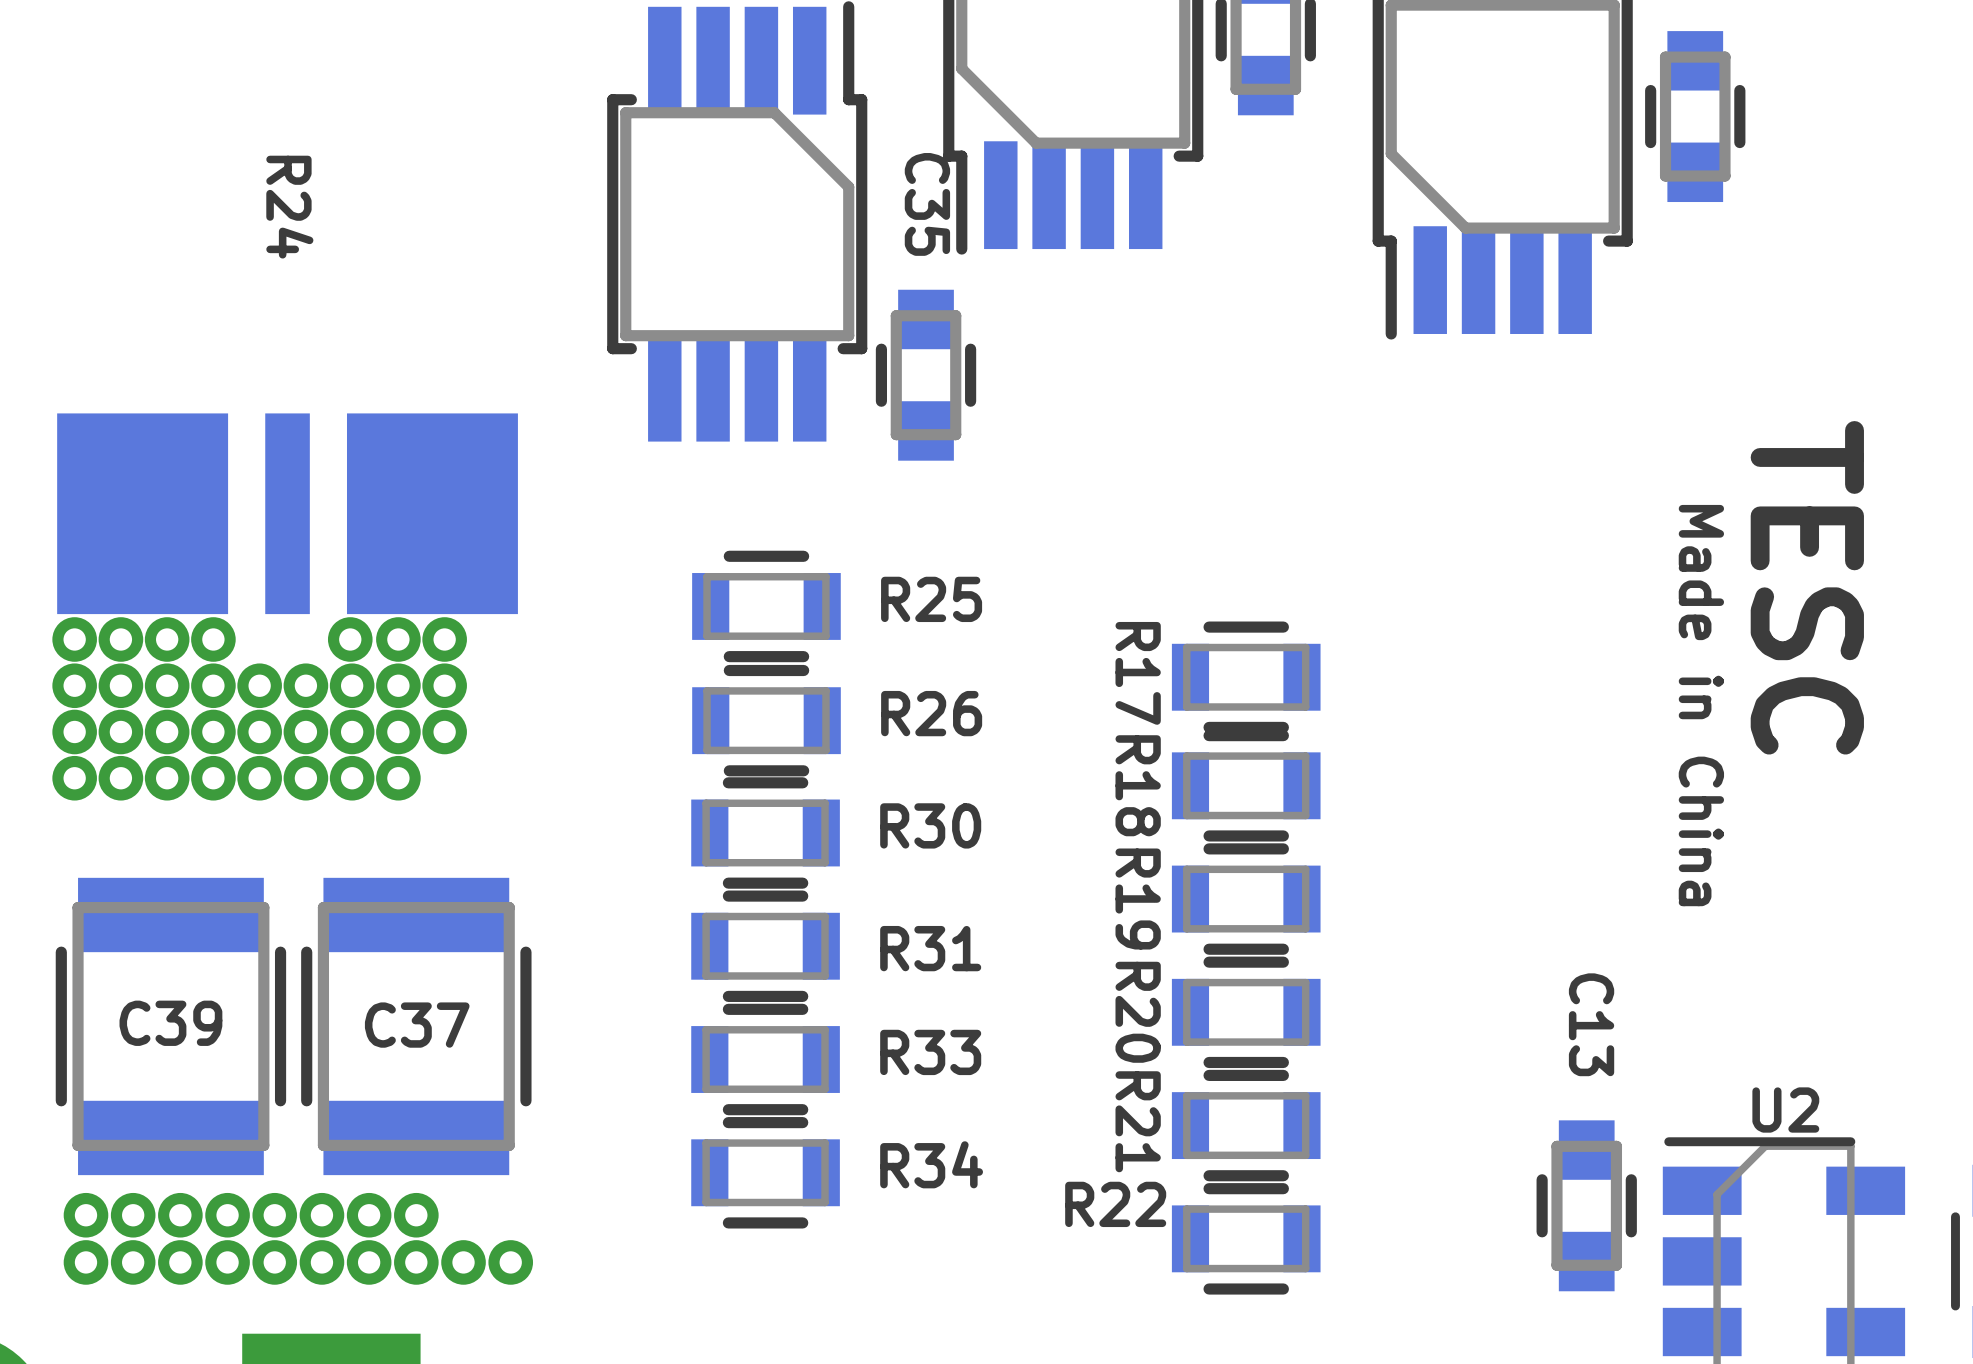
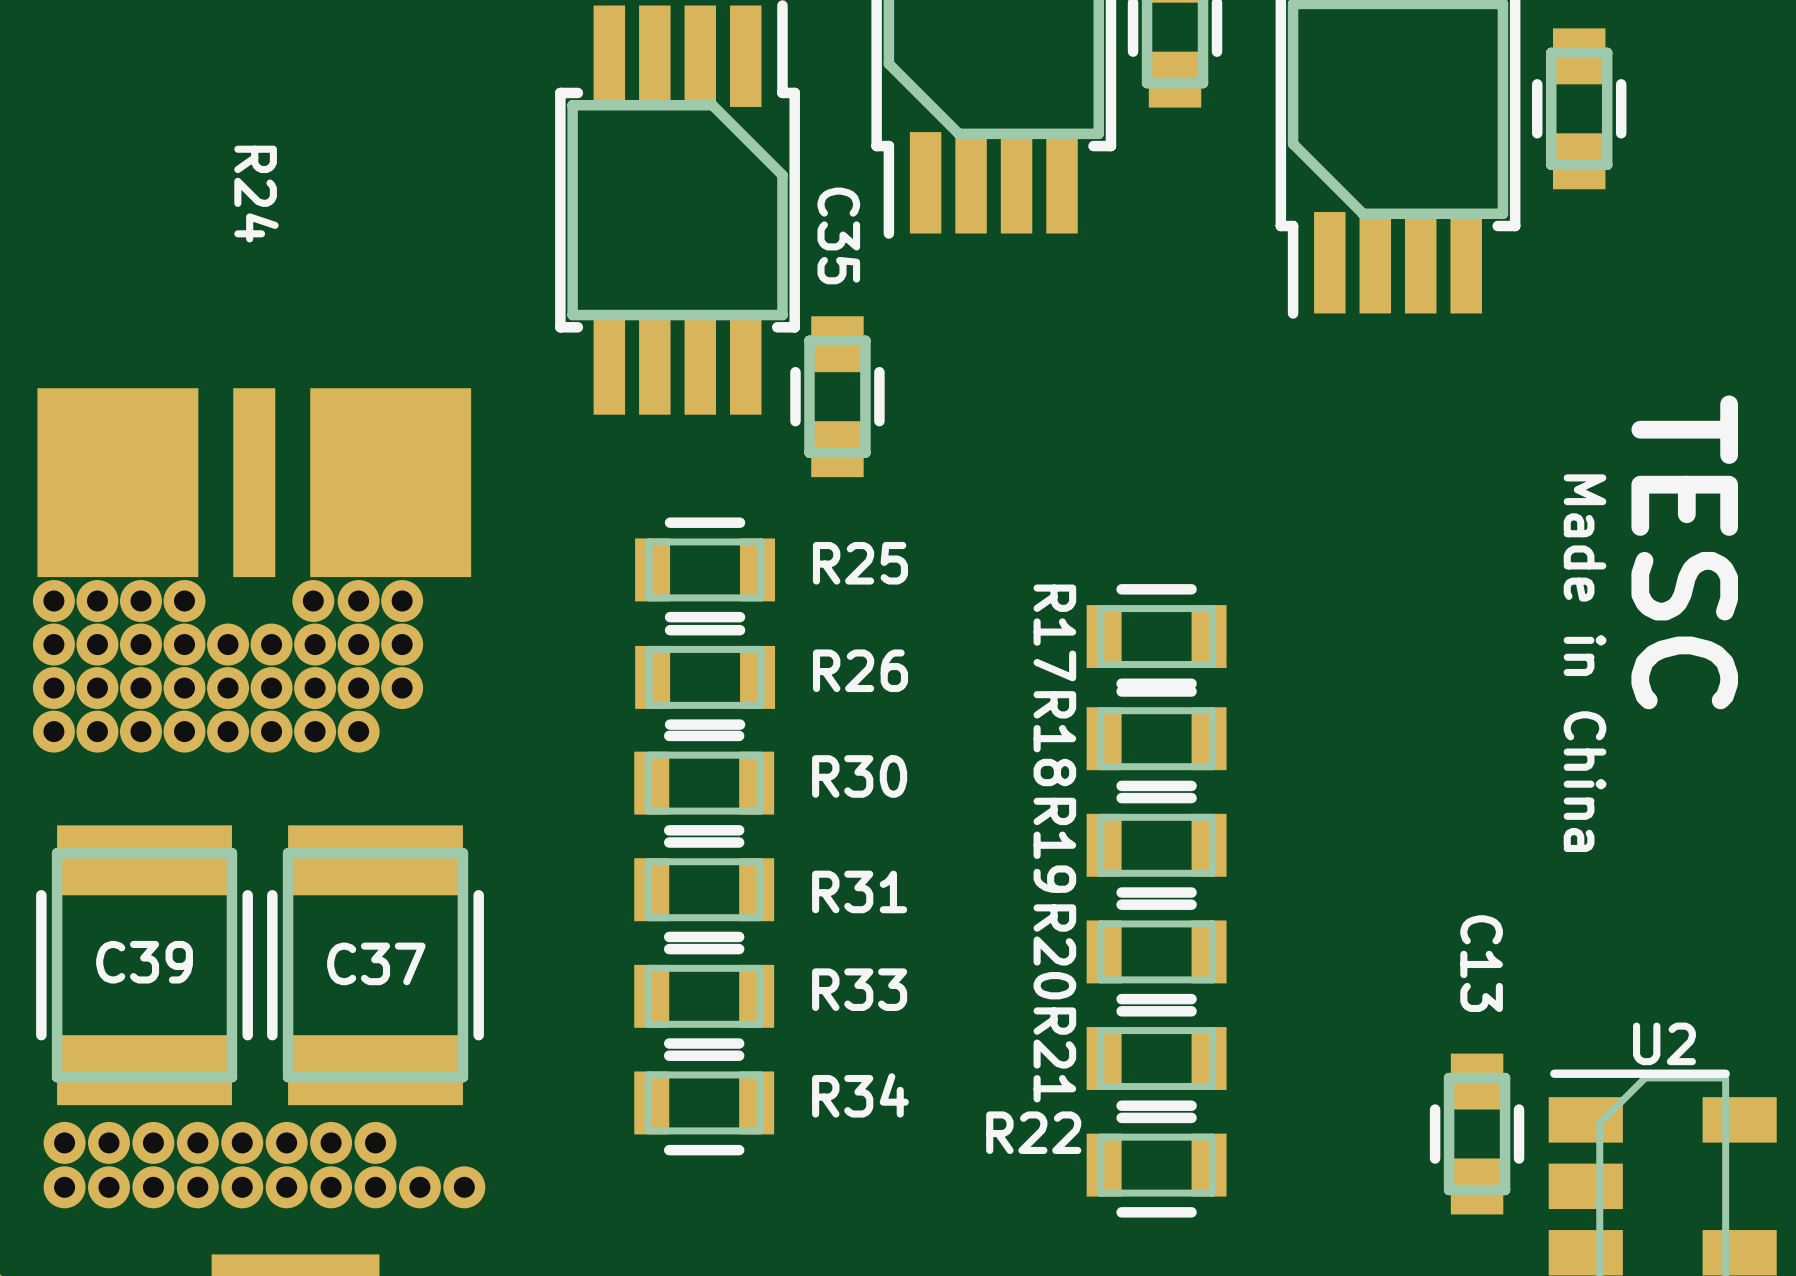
C35 position: (926, 375) -> (837, 396)

